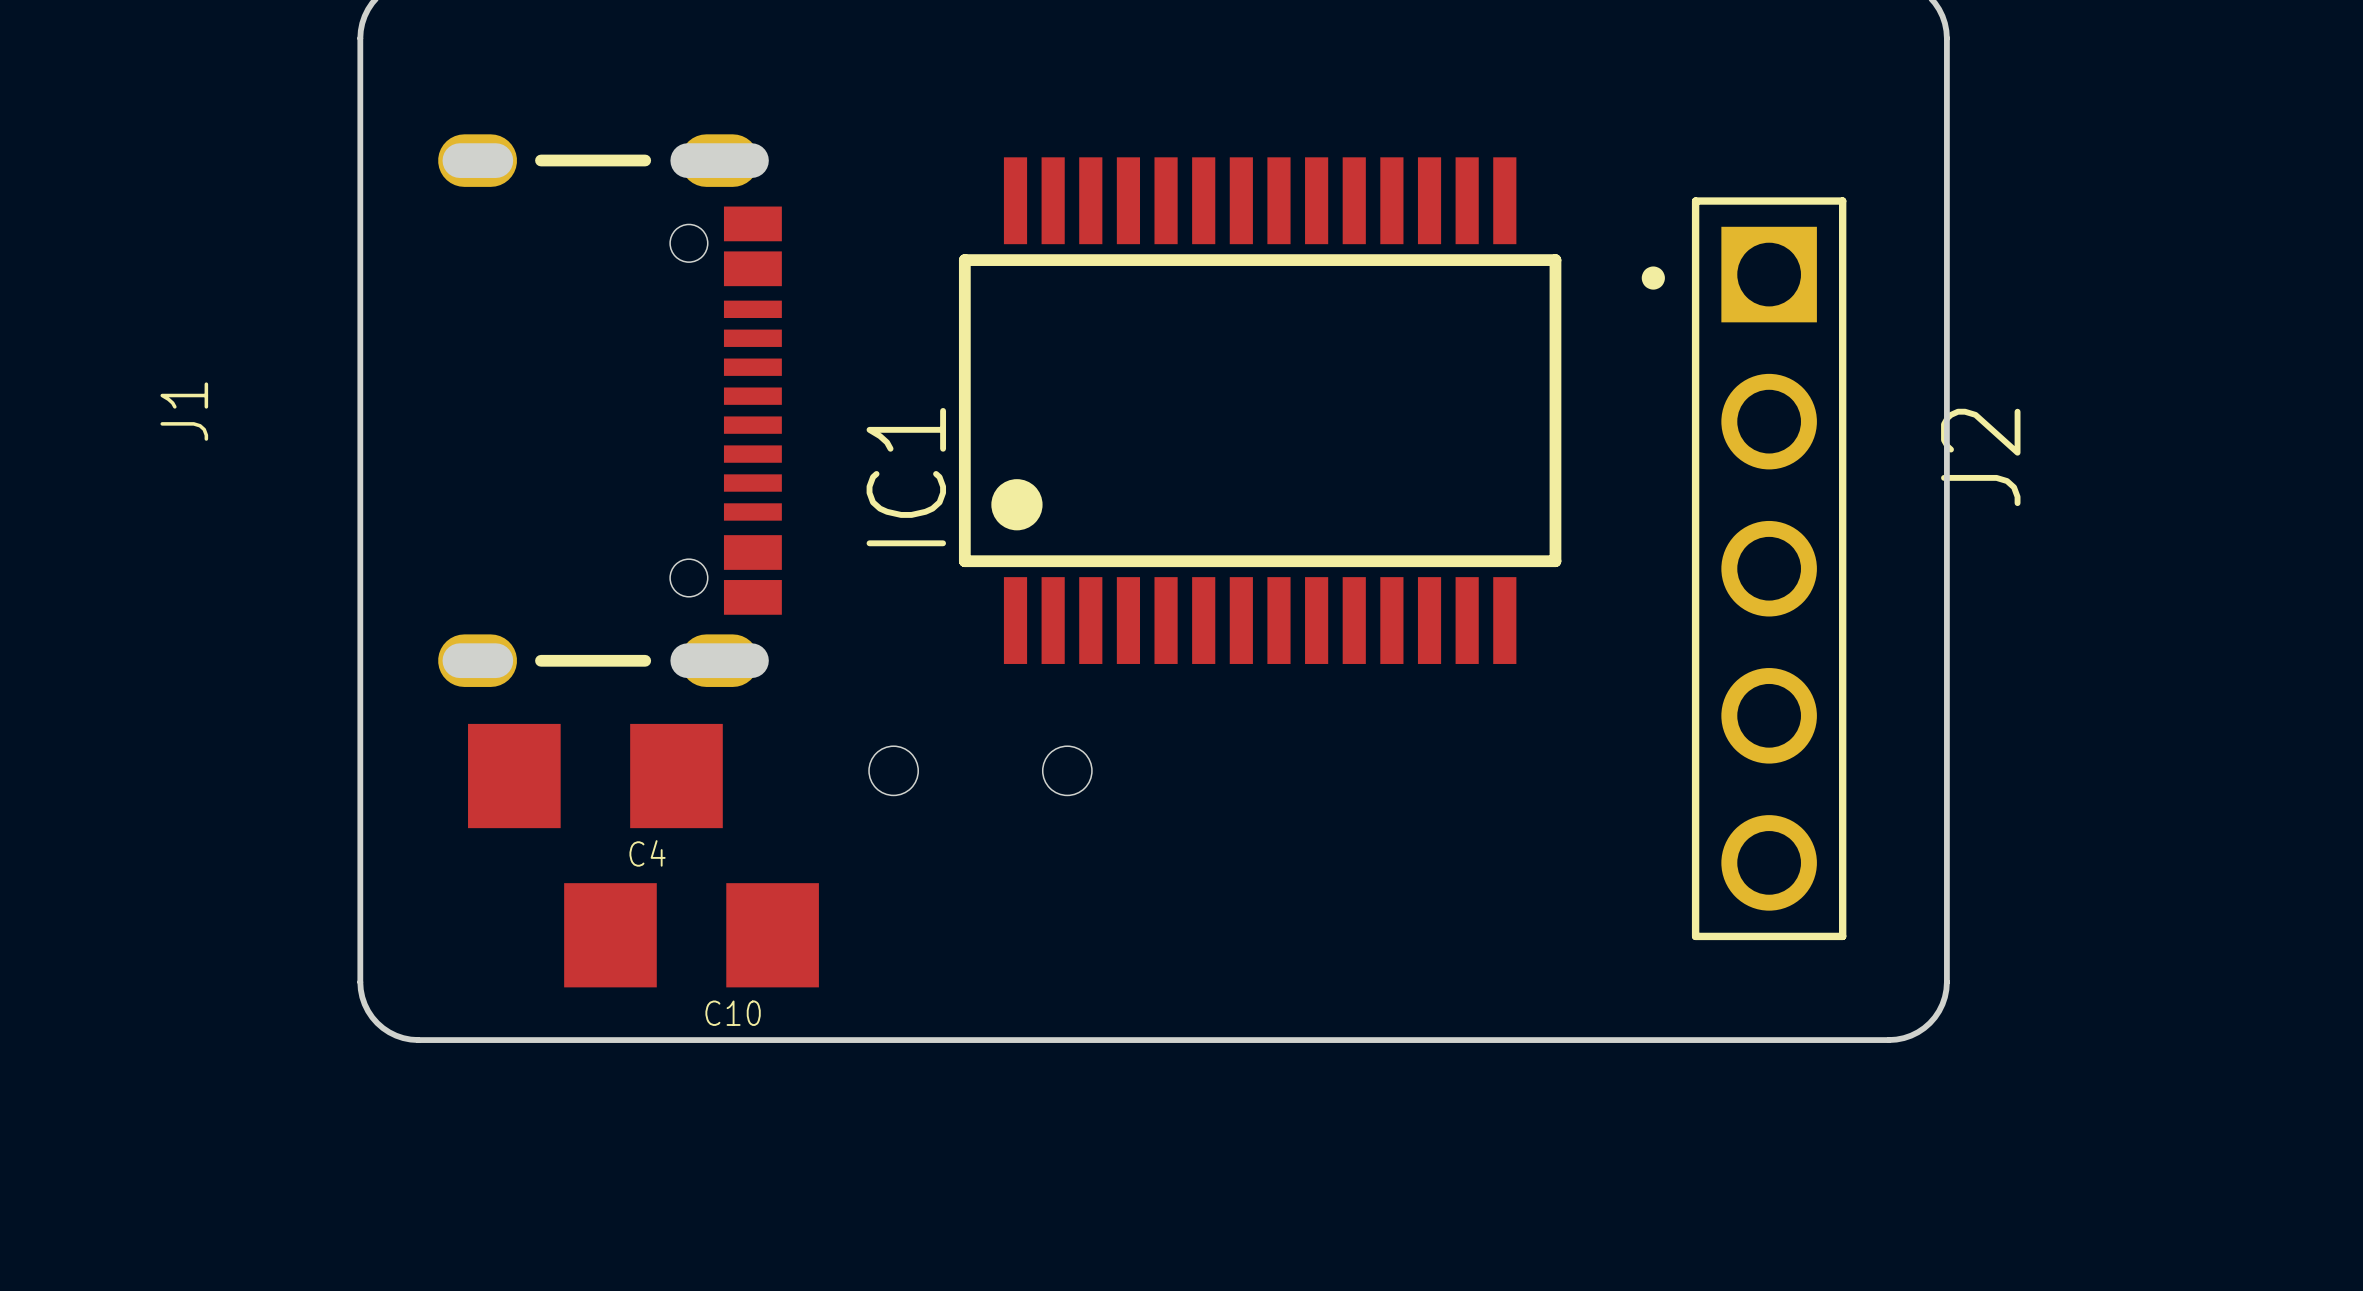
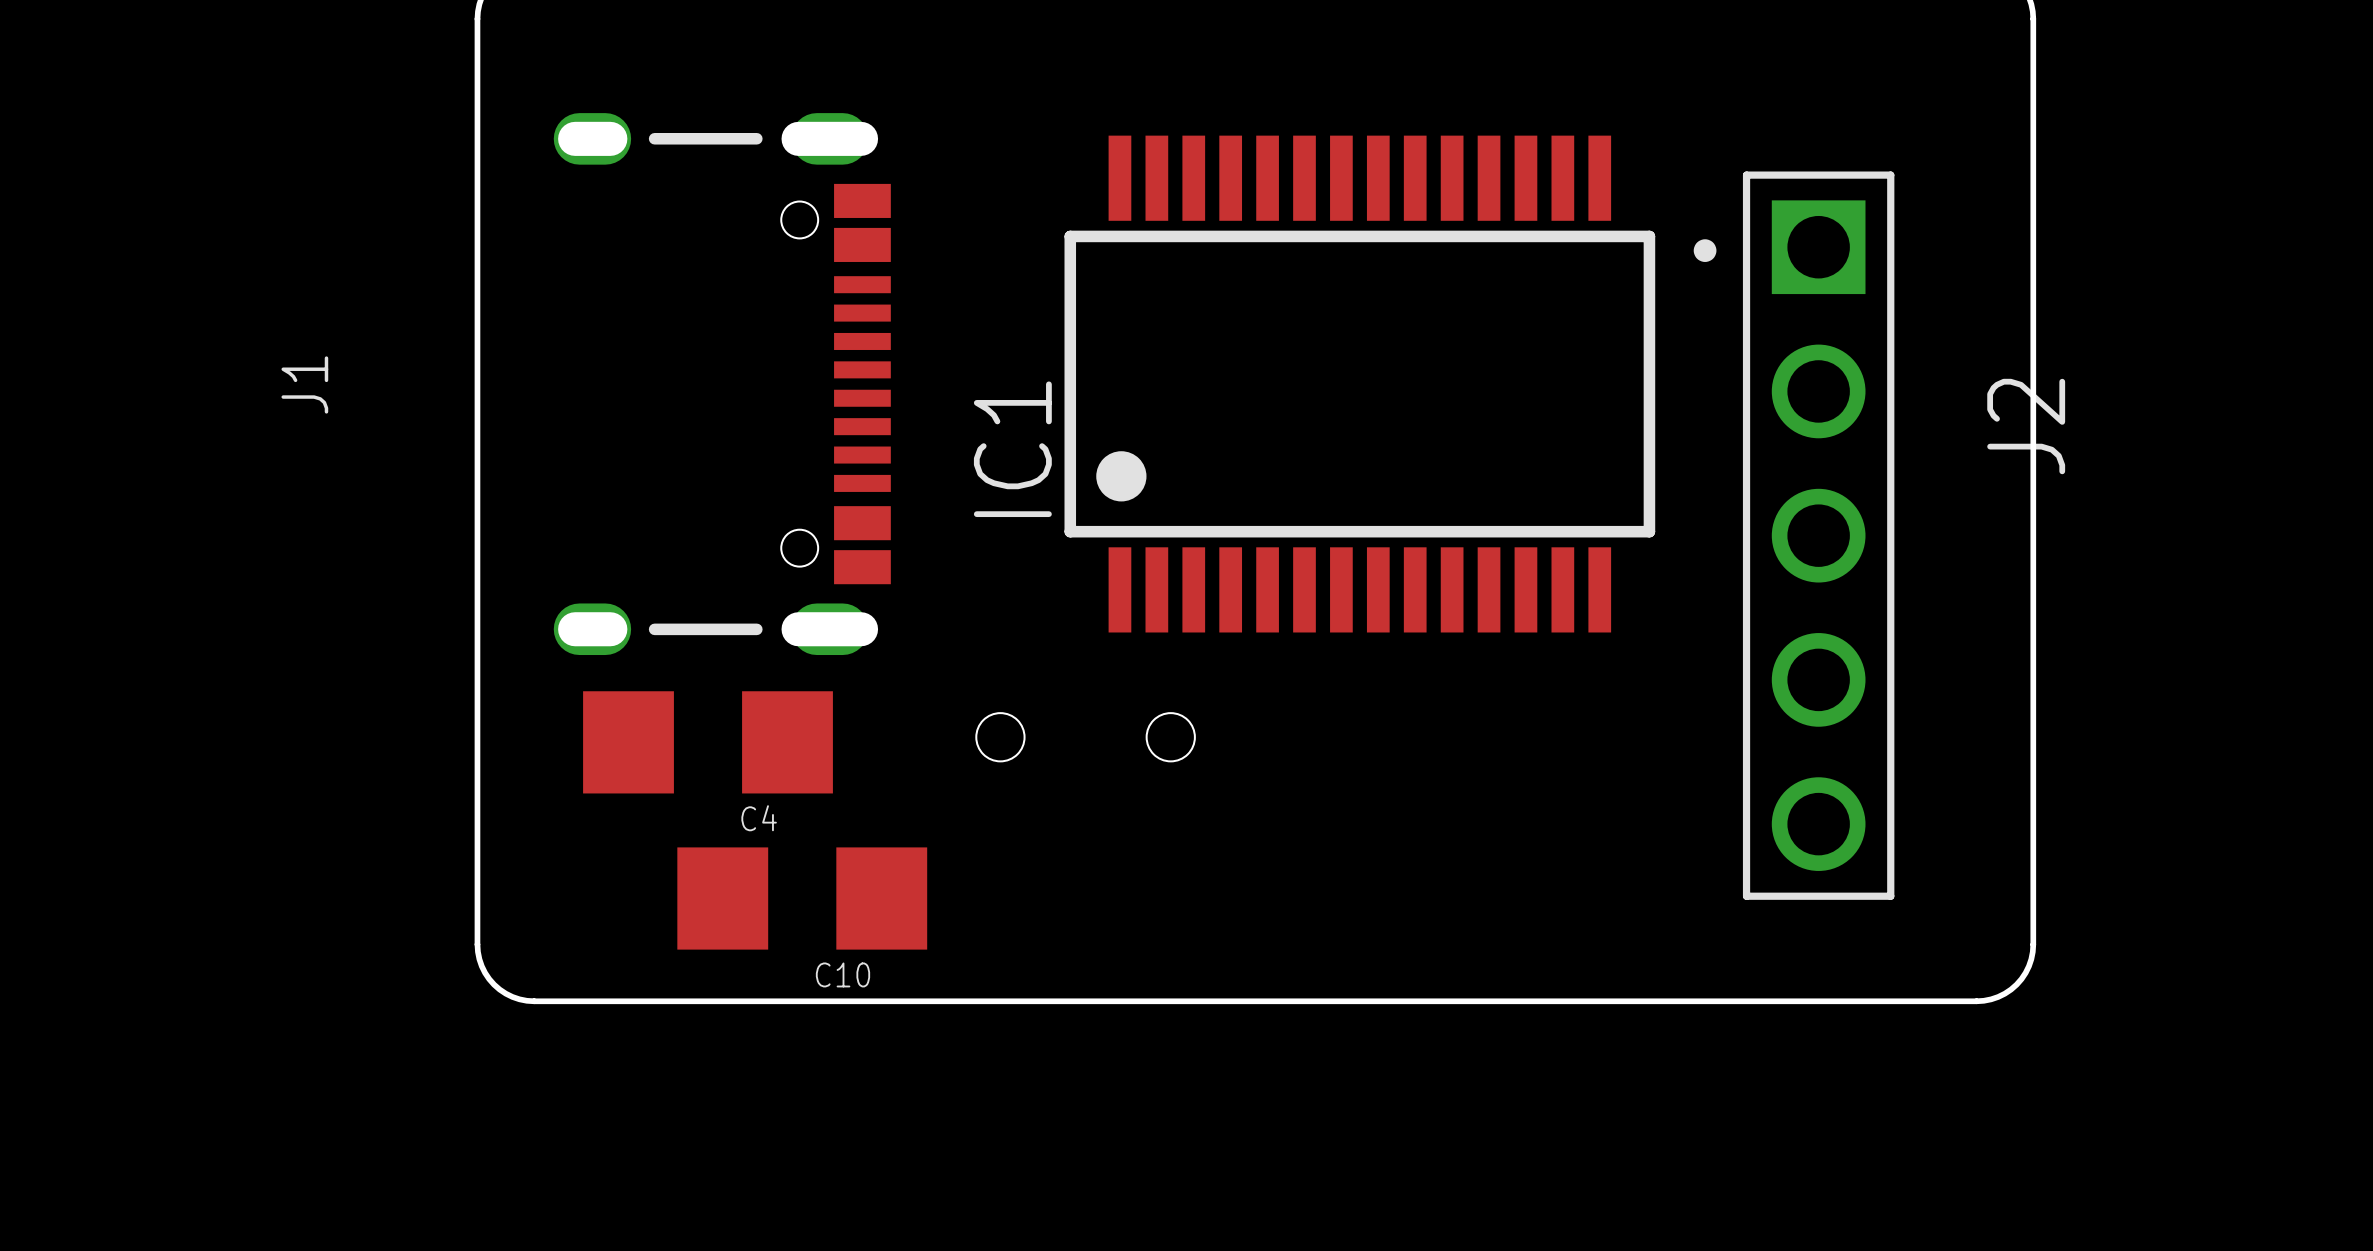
J2 position: (1744, 568) -> (1794, 535)

